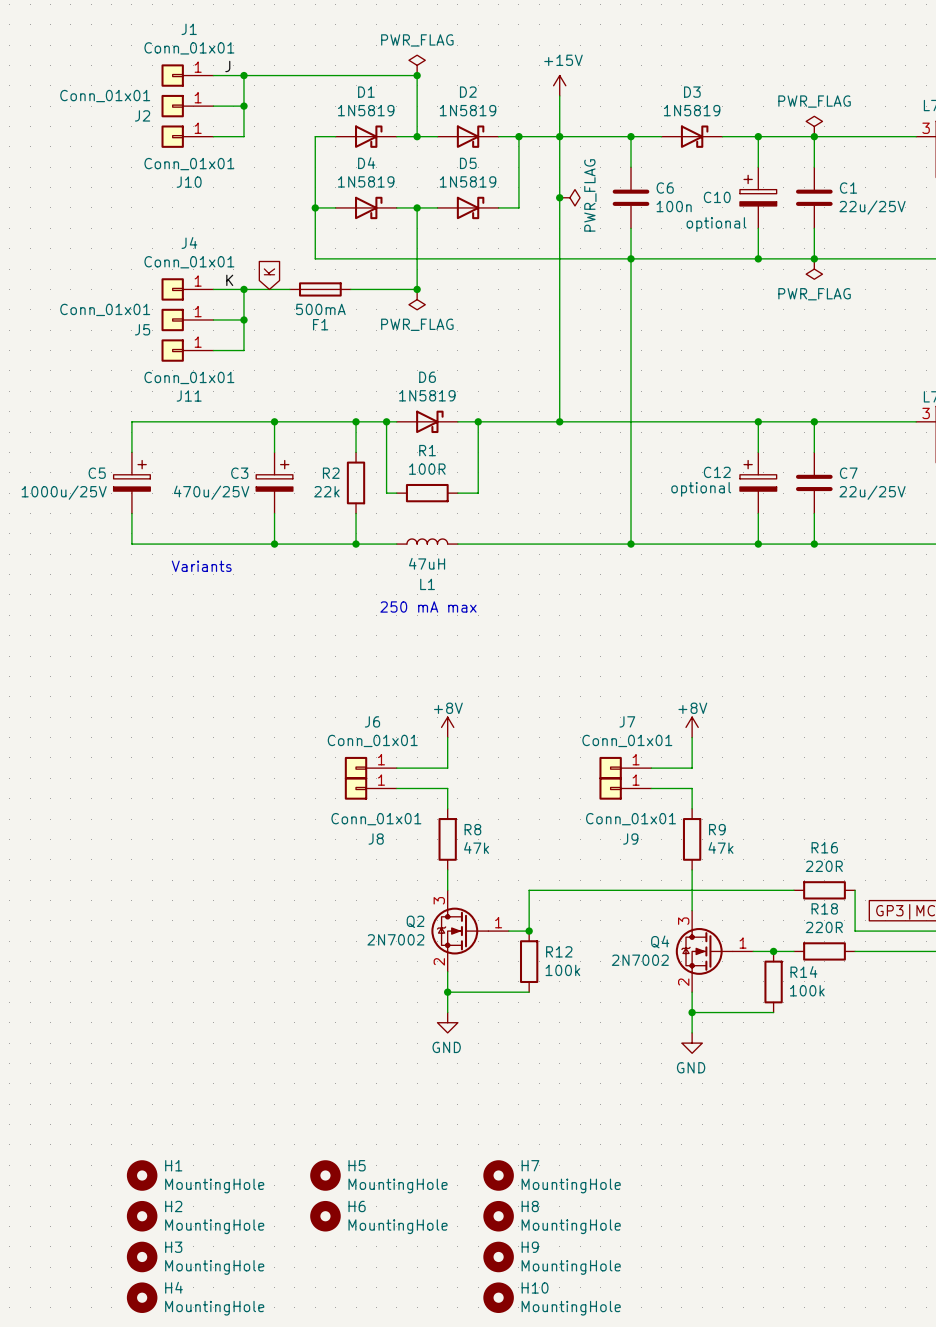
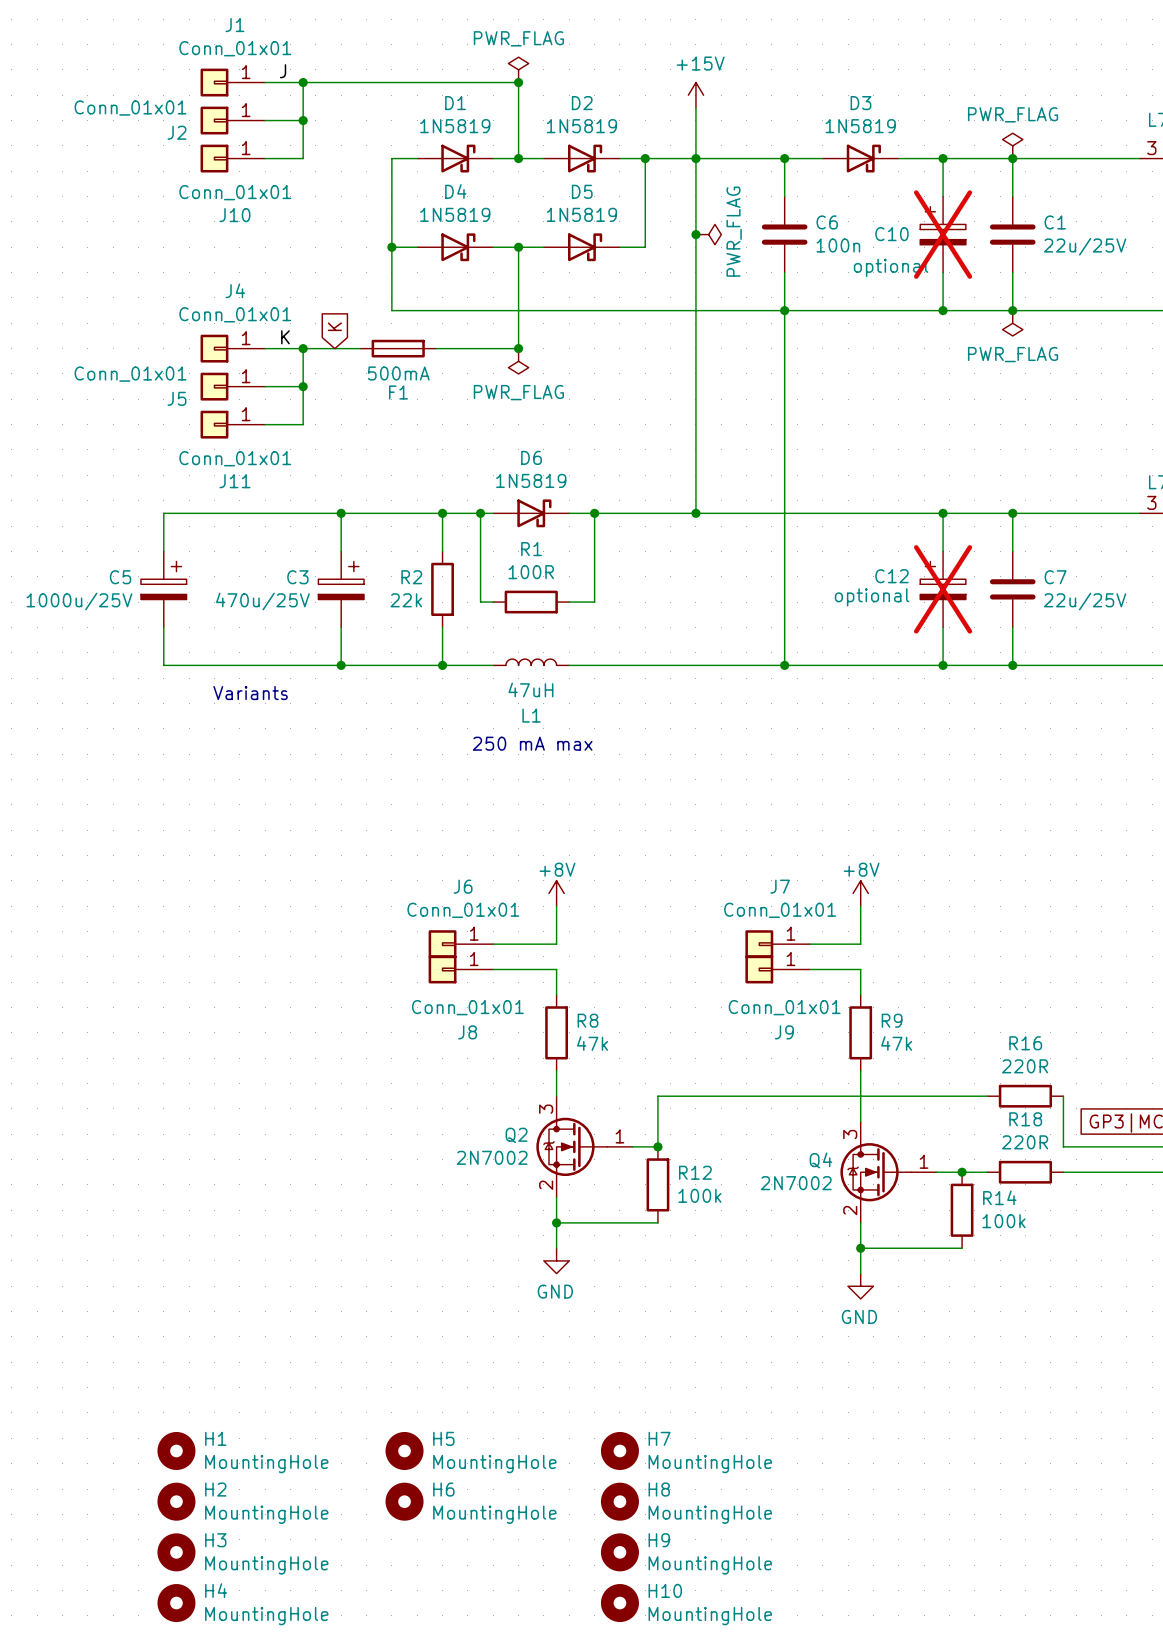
C10 do-not-place cross: none -> (943, 234)
C12 do-not-place cross: none -> (943, 589)

